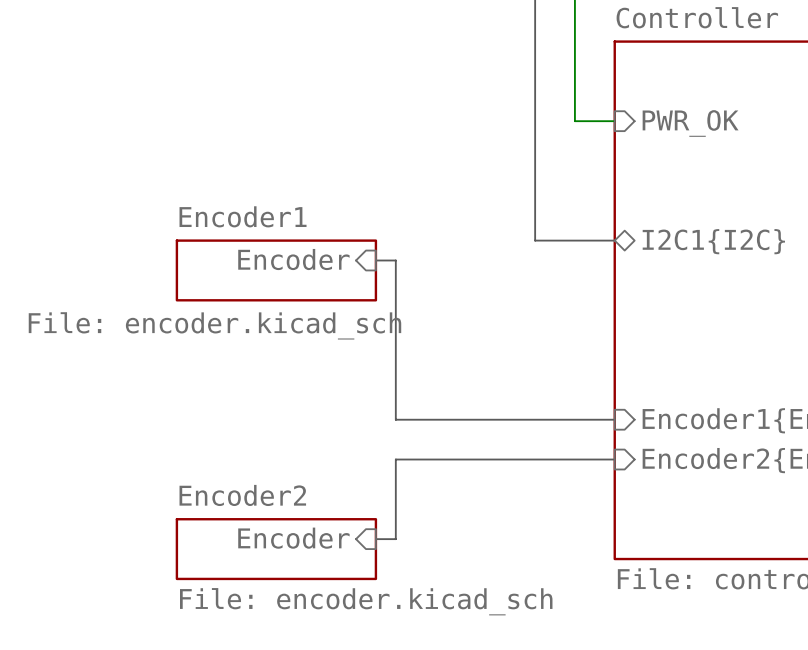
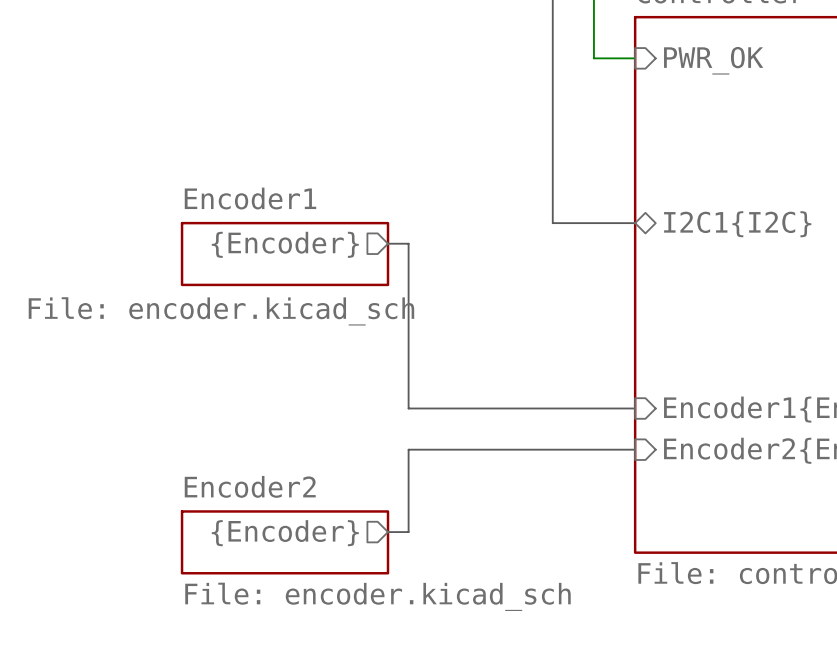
wire: (574, 81) (574, 121) (614, 121) -> (593, 58) (635, 58)
sheet pin position: PWR_OK (690, 123) -> PWR_OK (713, 60)
sheet pin shape: input (293, 259) -> output (285, 244)
sheet pin: Encoder (293, 259) -> {Encoder} (285, 244)
sheet pin shape: input (293, 538) -> output (285, 533)
sheet pin: Encoder (293, 538) -> {Encoder} (285, 533)

